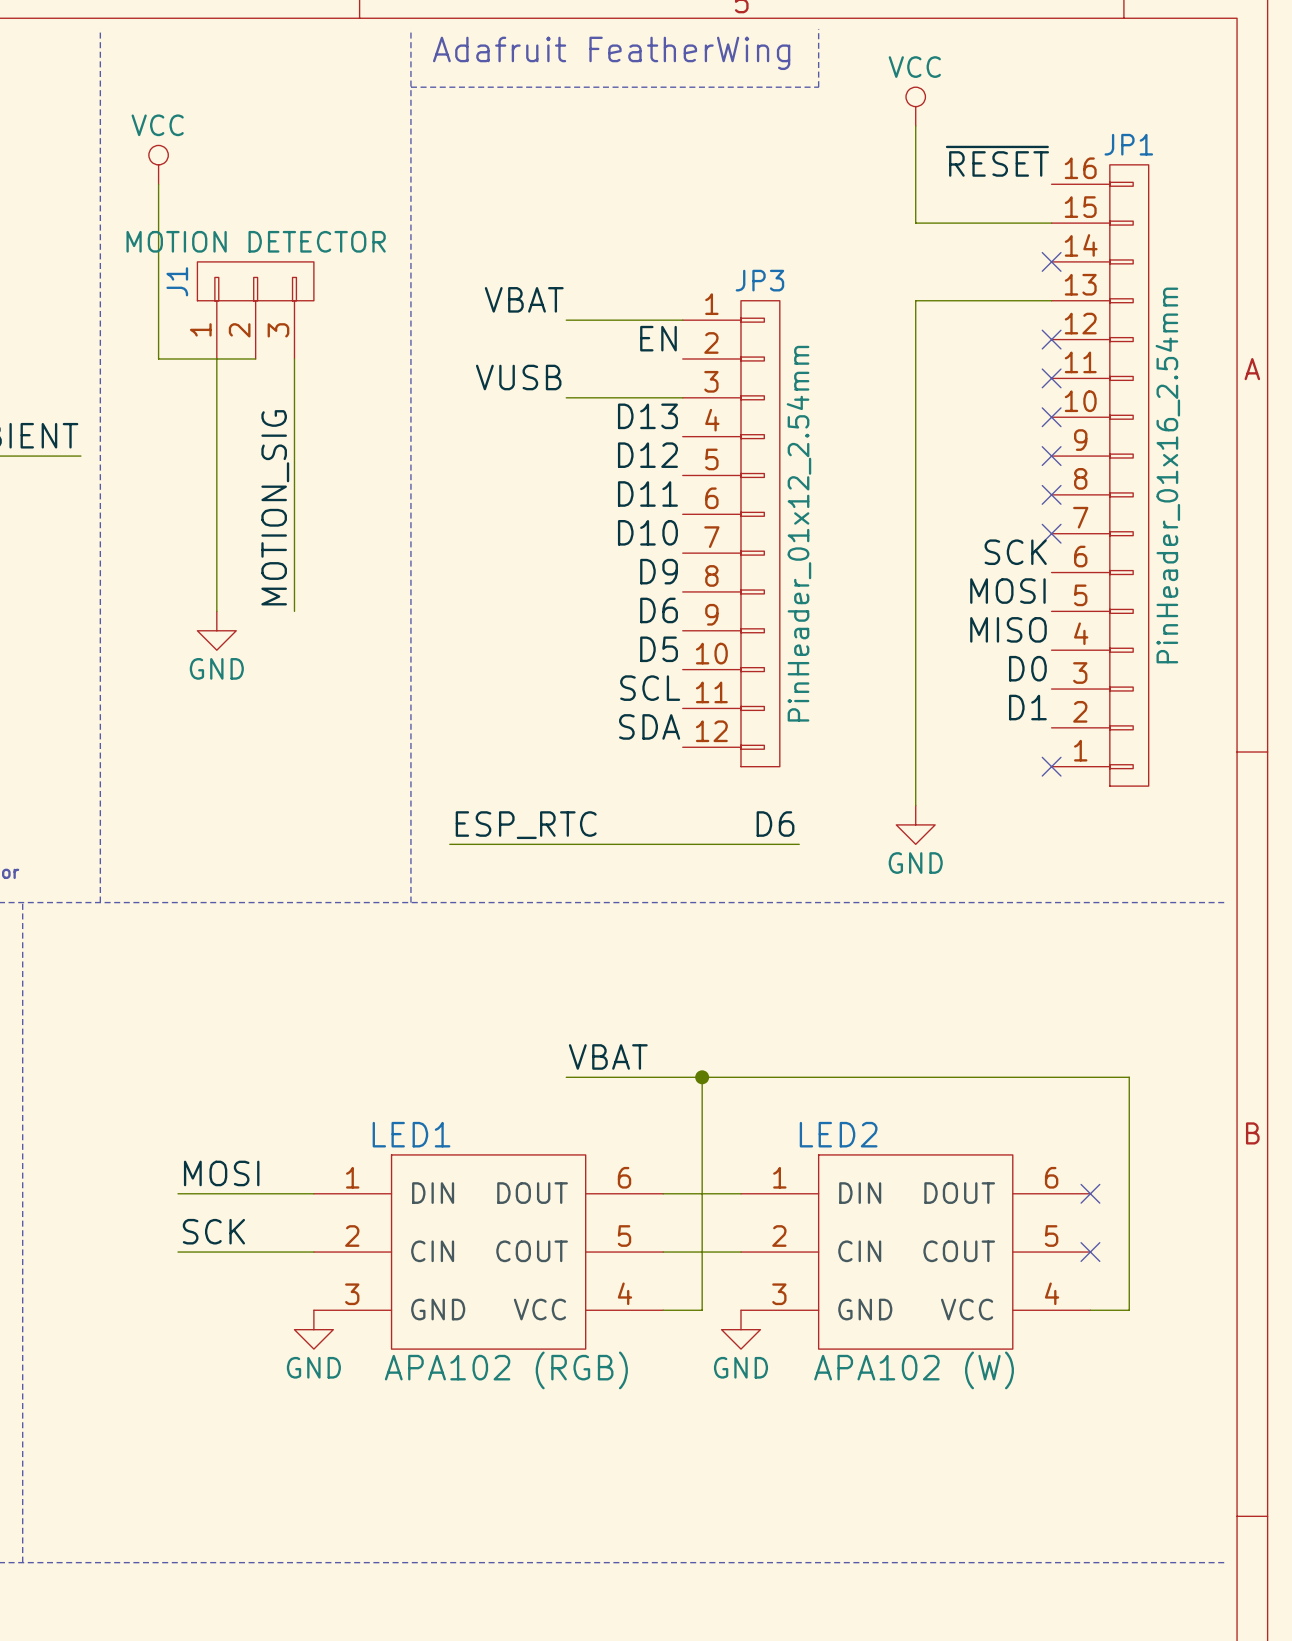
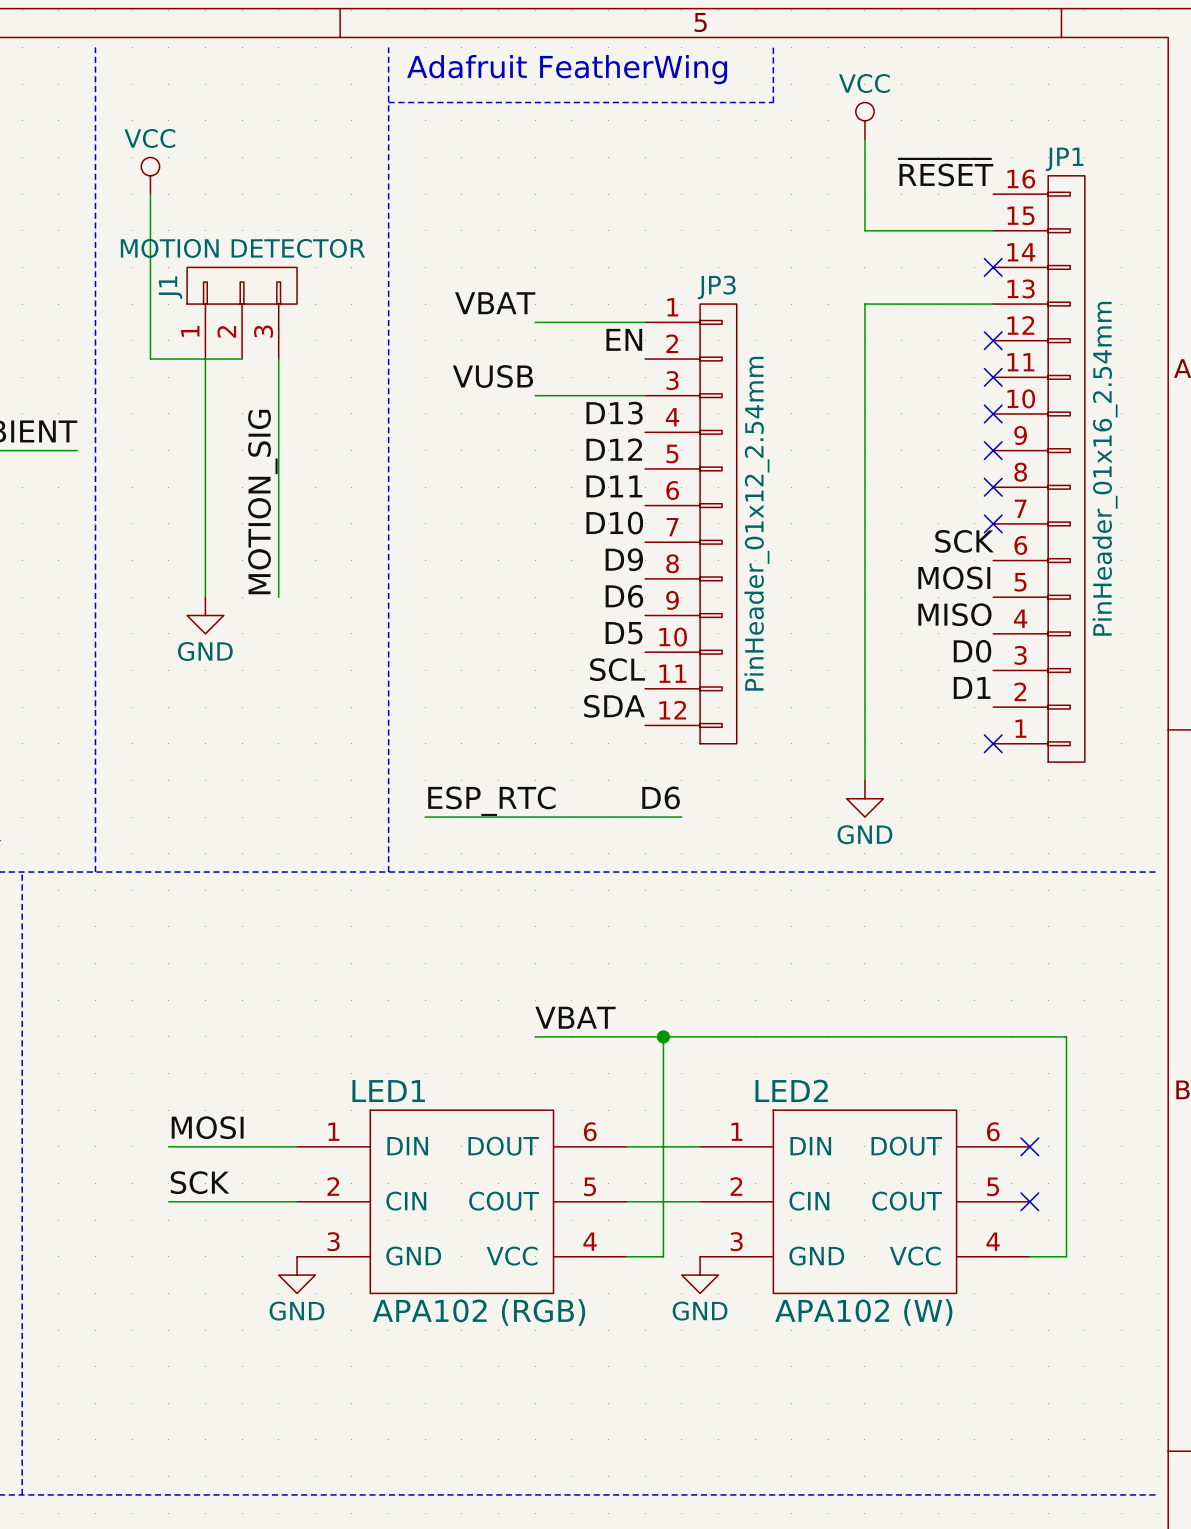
label position: D6 (775, 824) -> D6 (661, 797)
wire: (721, 844) (799, 844) -> none

